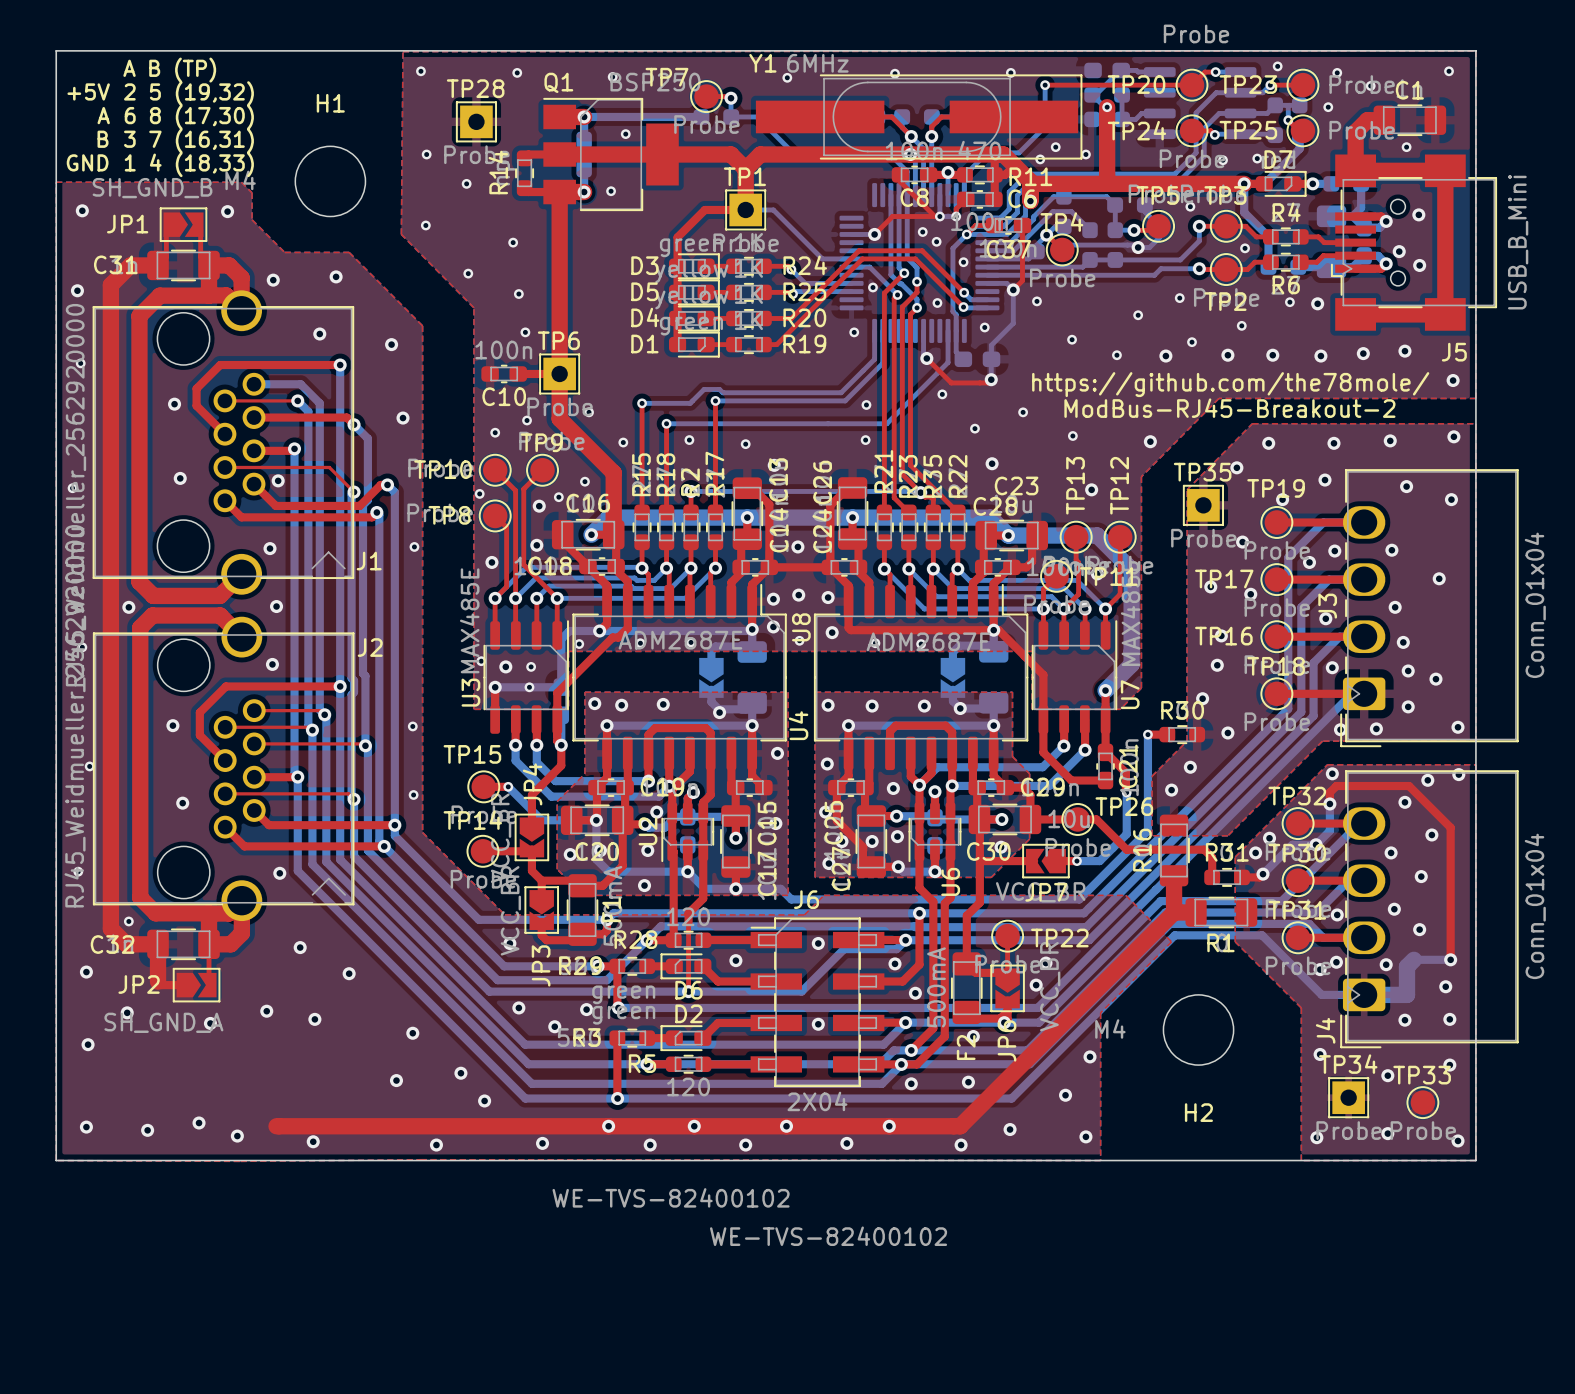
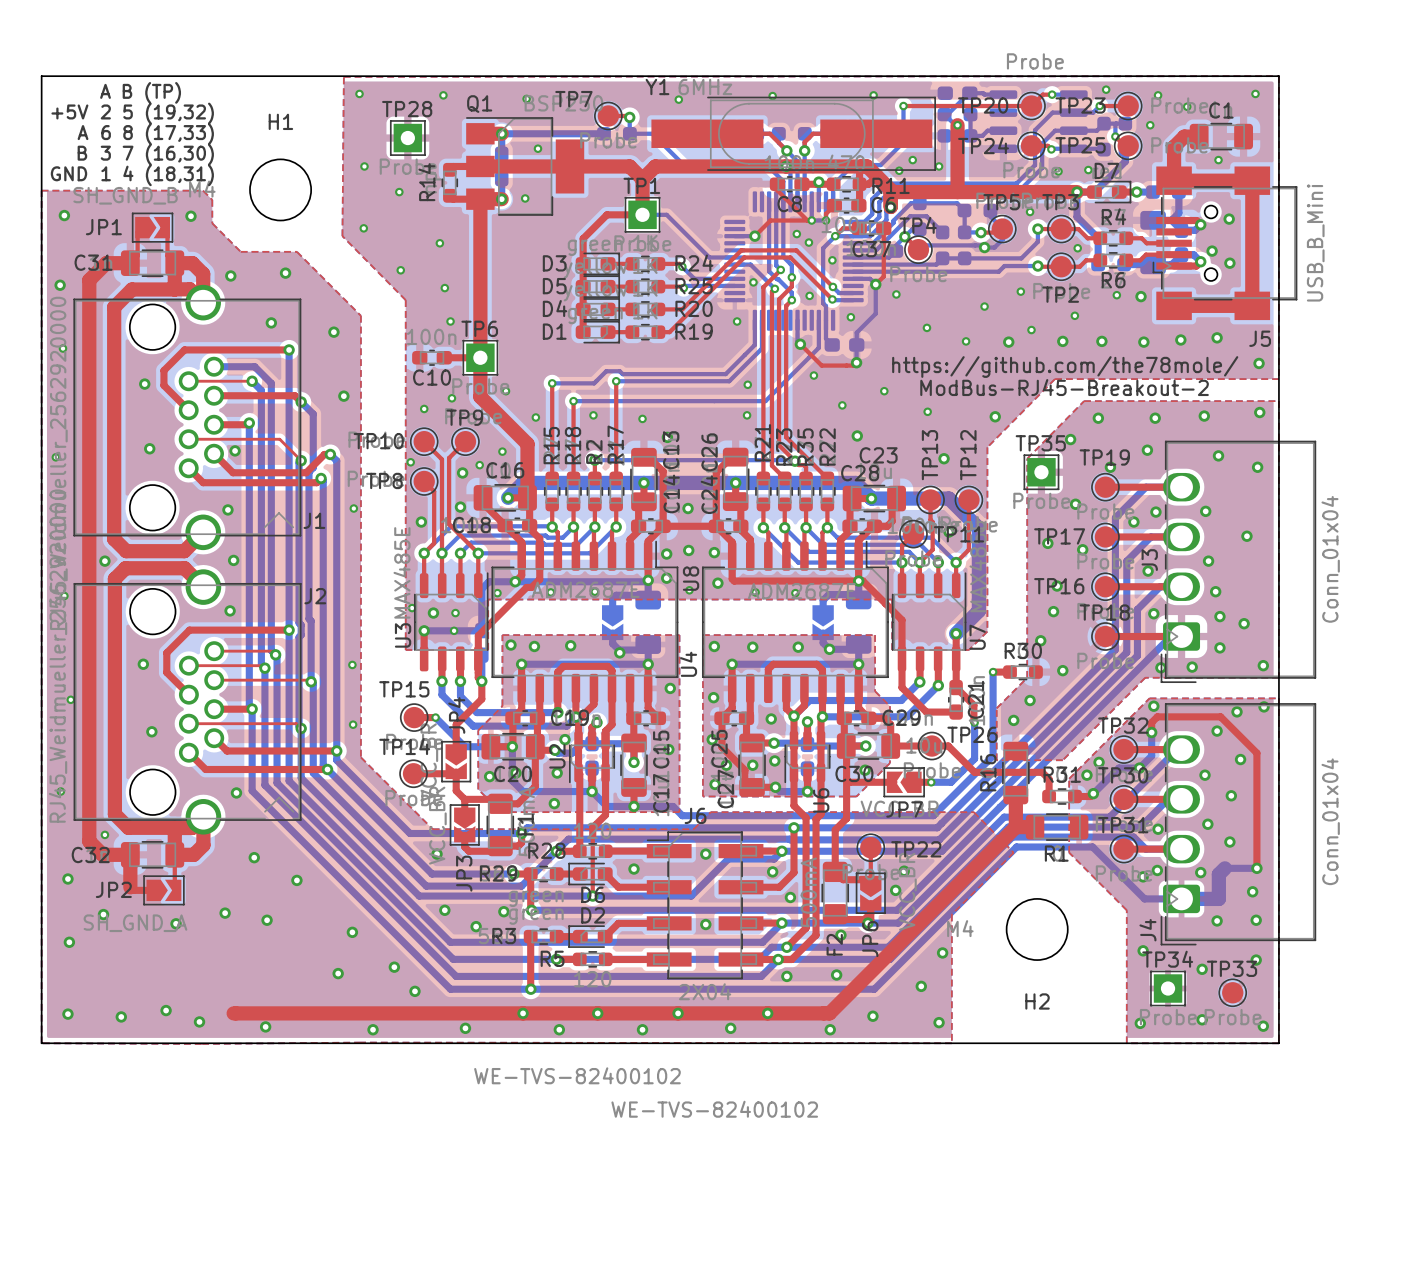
text: 6 8 (17,30) (189, 117) -> 6 8 (17,33) (157, 134)
text: 3 7 (16,31) (188, 140) -> 3 7 (16,30) (157, 154)
text: 1 4 (18,33) (189, 164) -> 1 4 (18,31) (157, 175)

